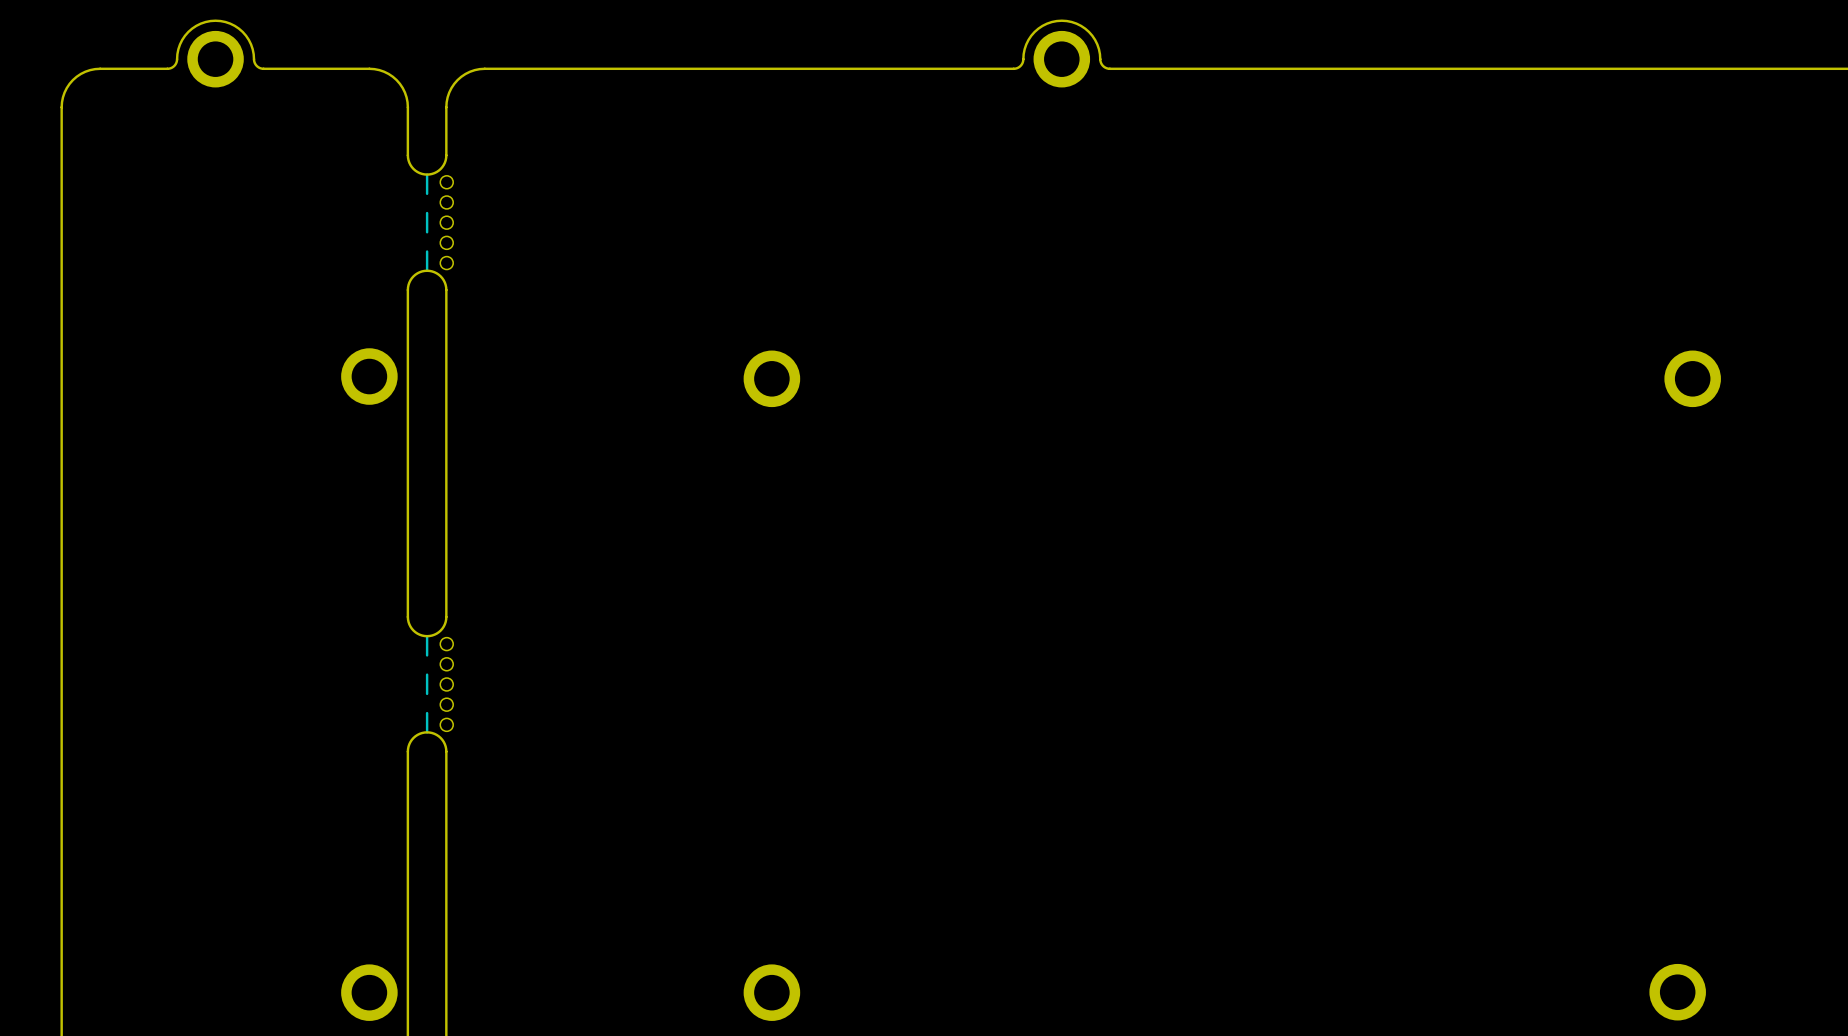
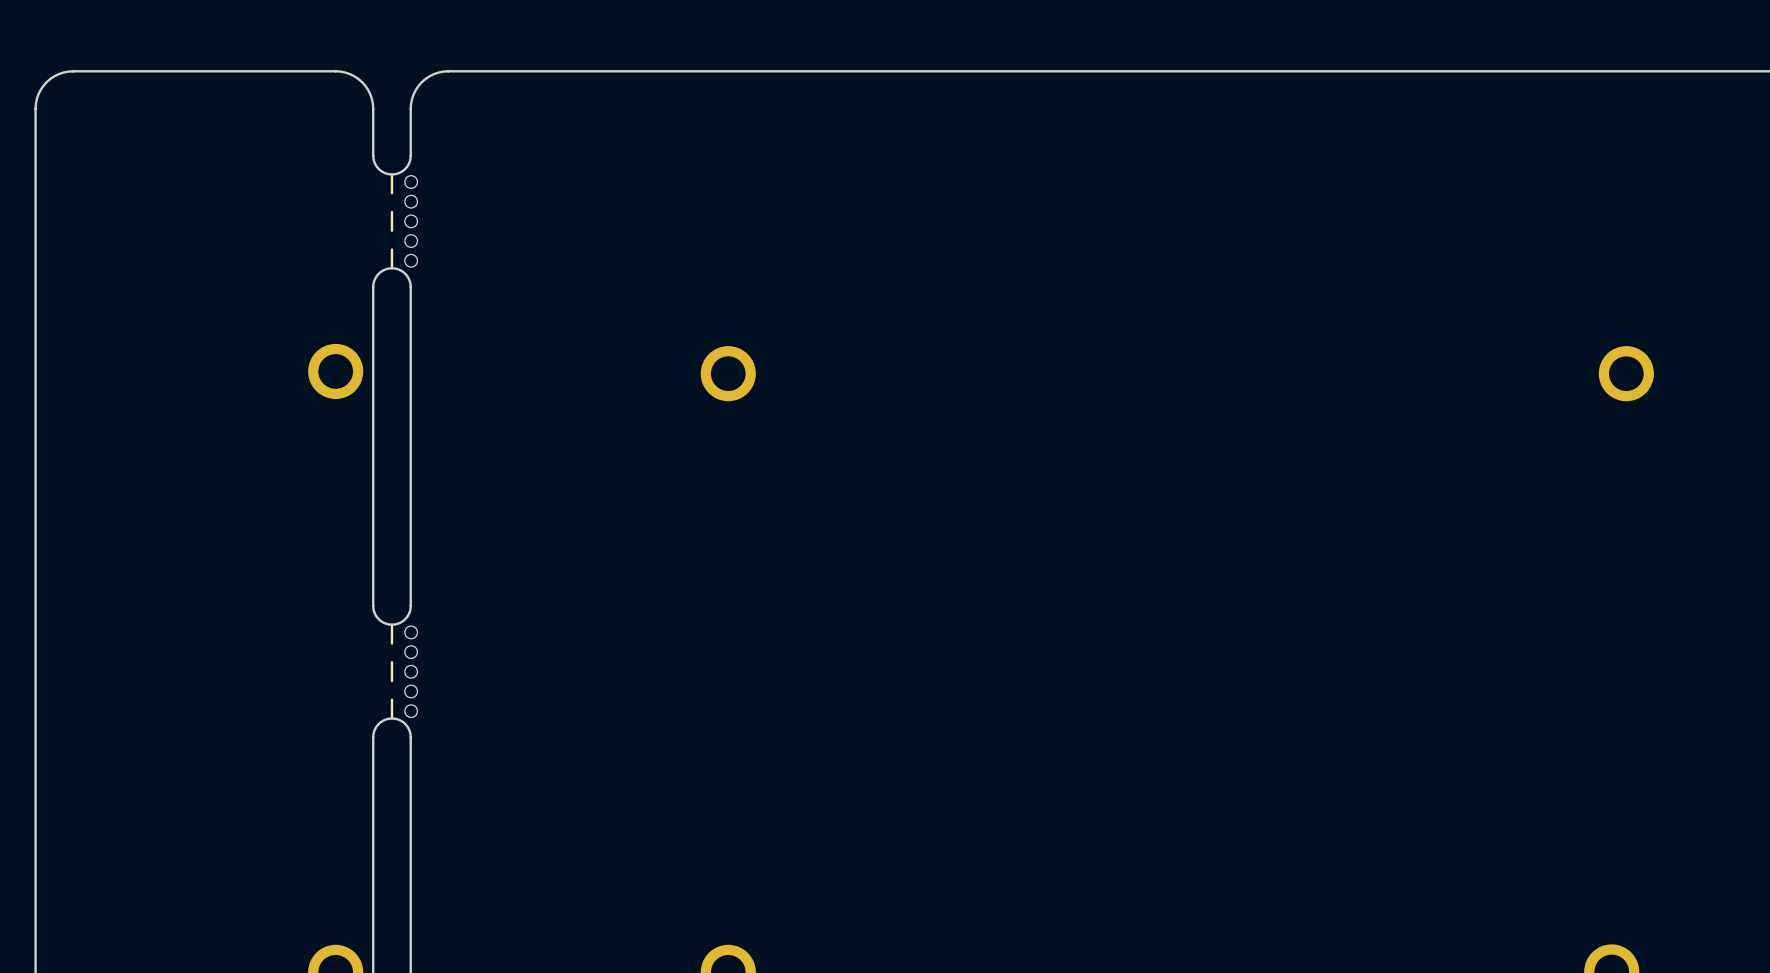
part: (215, 59) -> none
part: (1061, 59) -> none
board edge: (369, 68) (261, 68) (255, 63) (251, 44) (242, 31) (230, 23) (215, 20) (200, 23) (188, 31) (180, 44) (176, 62) (171, 68) (100, 68) -> (335, 71) (73, 71)
board edge: (1109, 68) (1101, 63) (1097, 44) (1089, 31) (1076, 23) (1061, 20) (1047, 23) (1034, 31) (1026, 44) (1022, 63) (1013, 68) -> (1057, 71) (964, 71)

